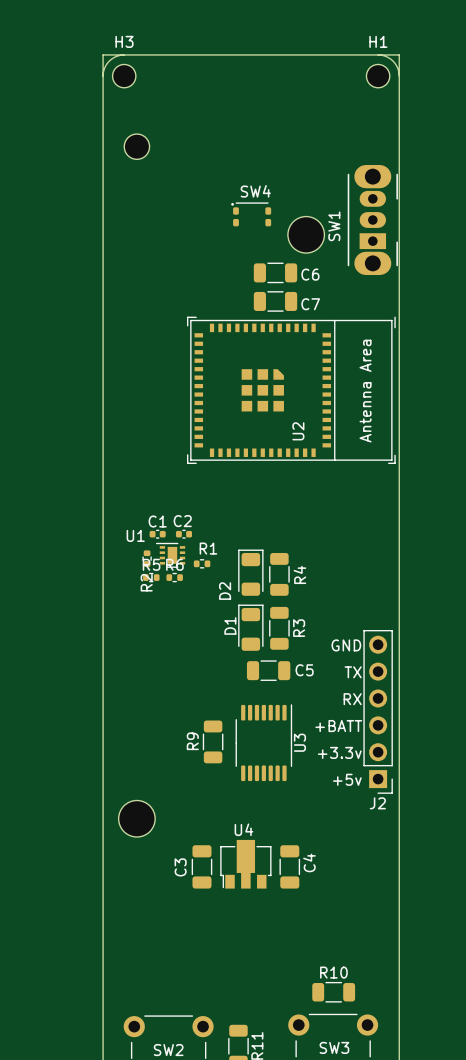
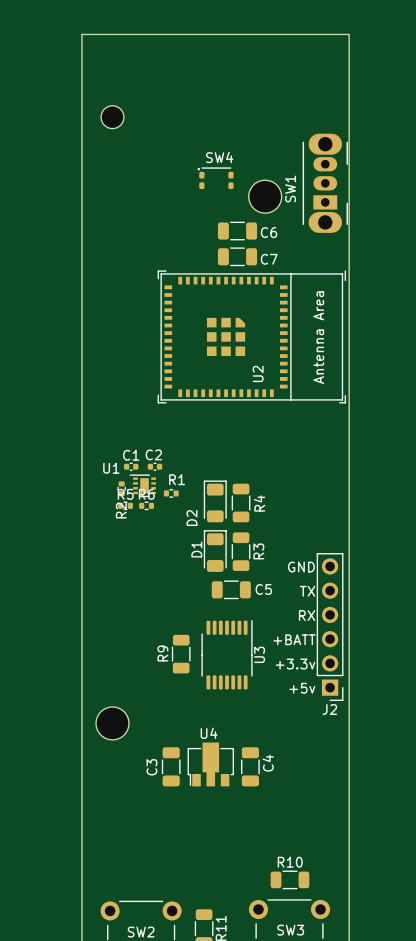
board edge: (124, 54) (117, 56) (109, 61) (104, 69) (103, 76) -> none
board edge: (378, 54) (385, 56) (393, 61) (398, 69) (399, 76) -> none
H3: (124, 76) -> none
H1: (378, 76) -> none

